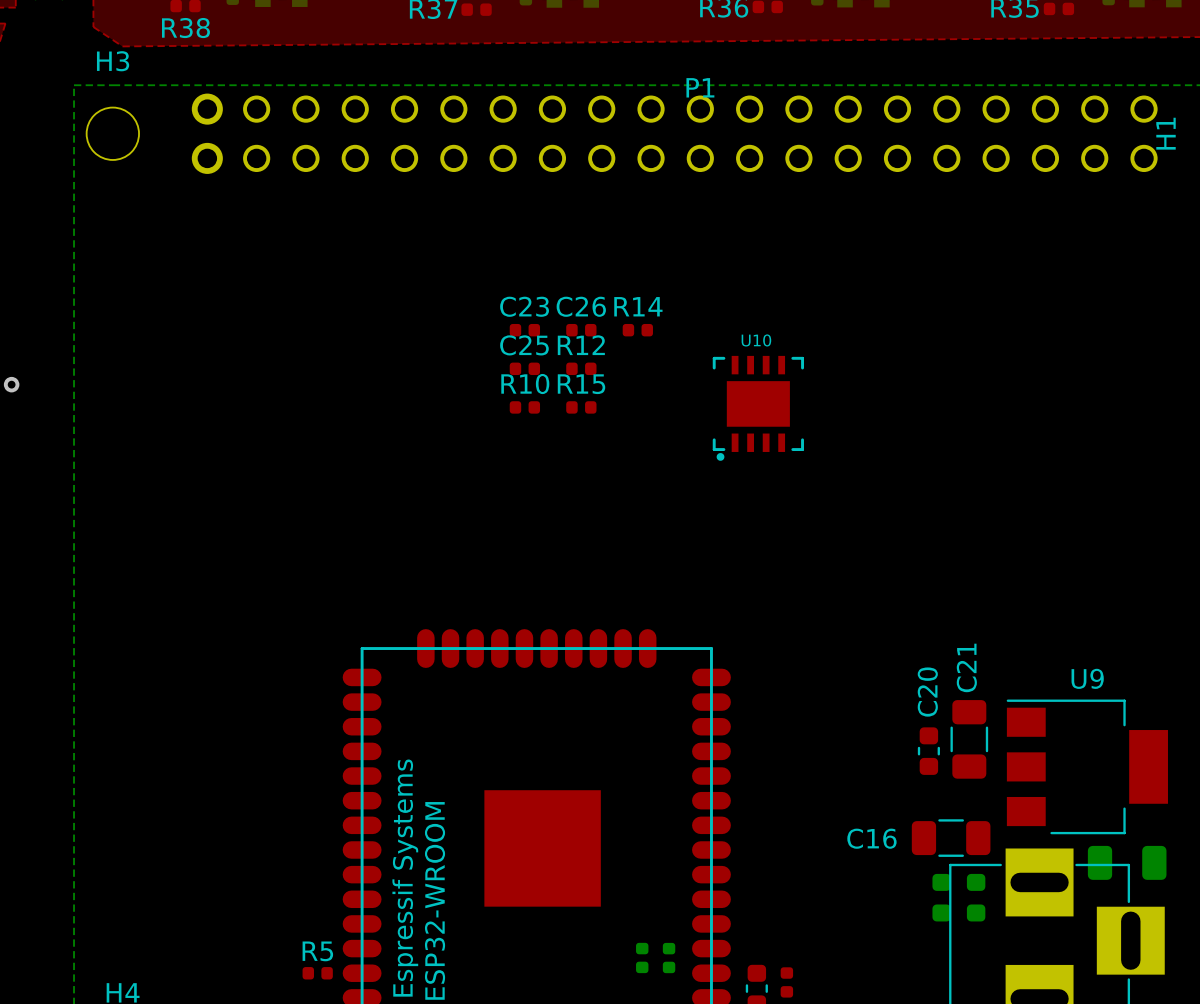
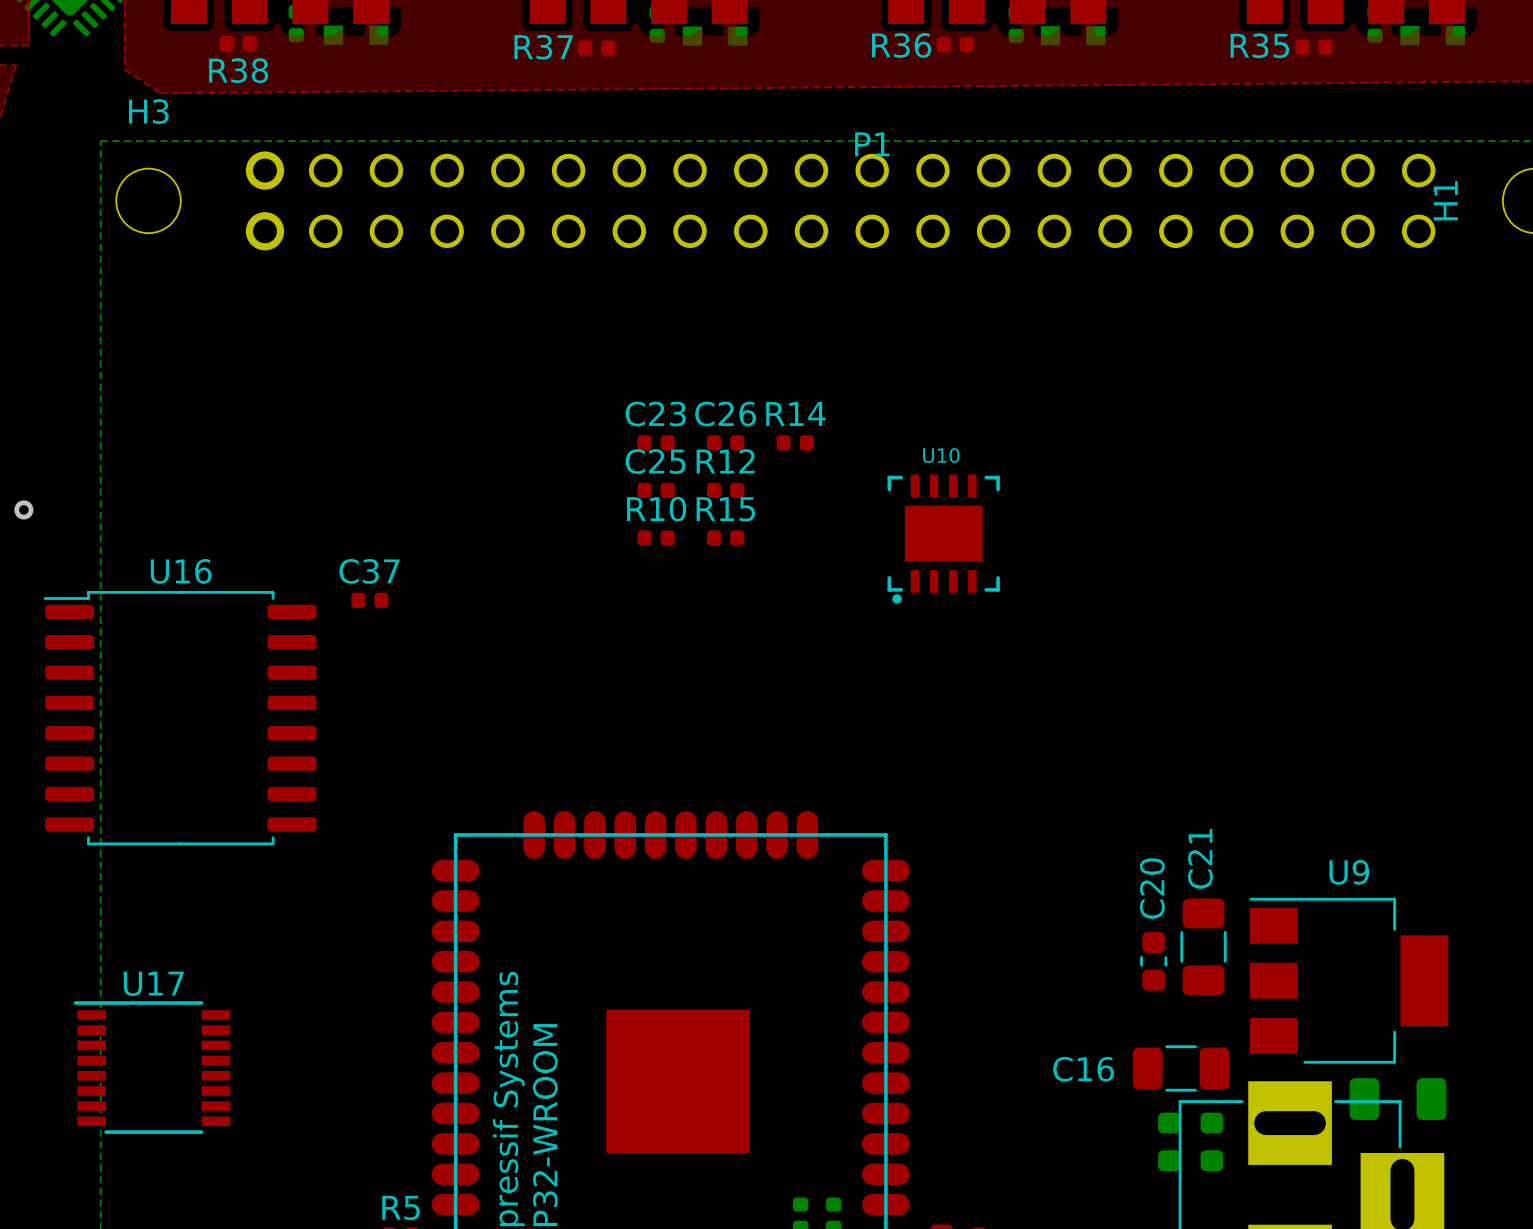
C37: none -> (369, 600)
U16: none -> (180, 718)
U17: none -> (152, 1067)

